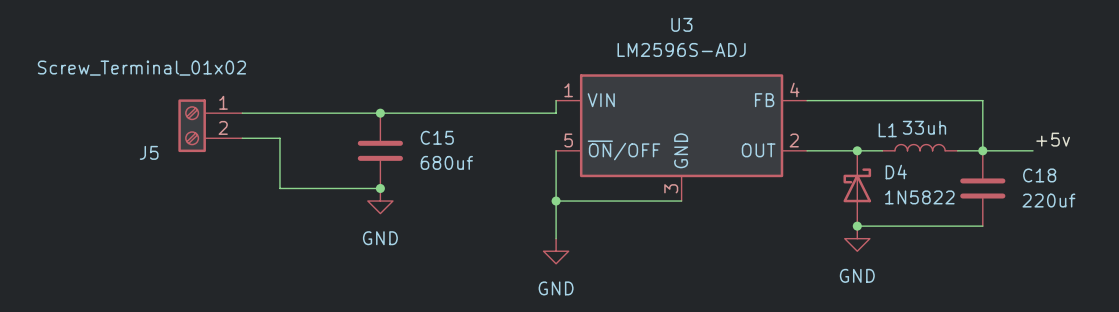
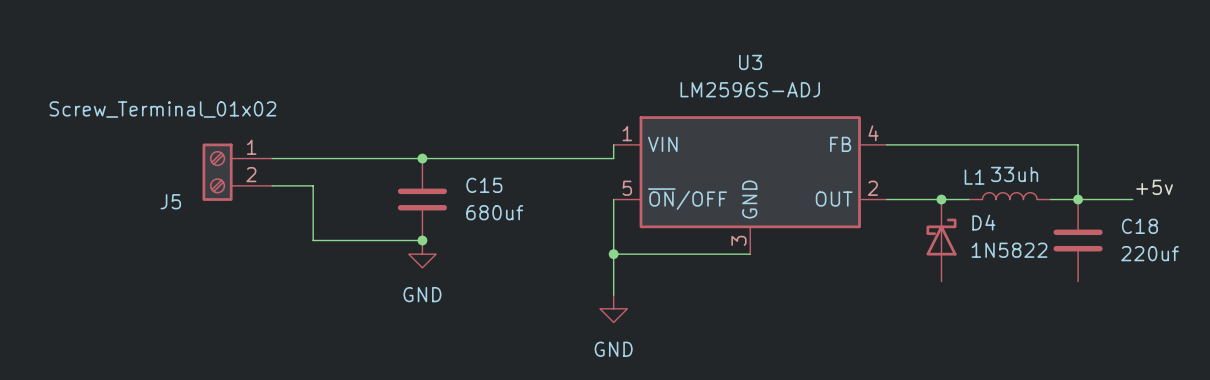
wire: (857, 226) (982, 226) -> none
junction: (857, 226) -> none
power symbol: GND (857, 238) -> none

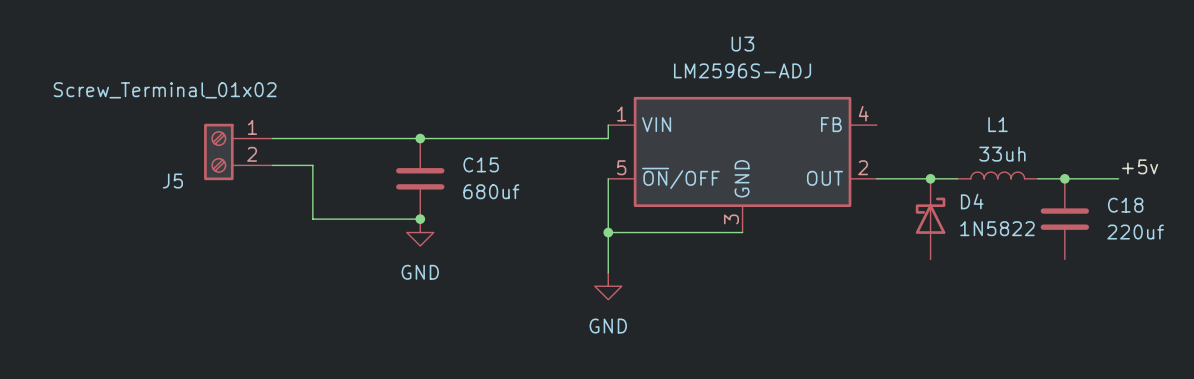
wire: (886, 144) (1078, 144) (1078, 199) -> none
L1 name position: L1 (974, 177) -> L1 (998, 124)

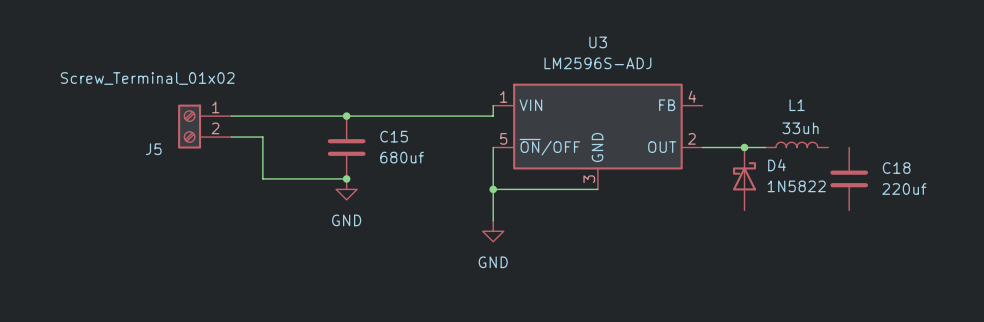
label: +5v (1140, 166) -> none
wire: (1037, 178) (1118, 178) -> none
junction: (1064, 178) -> none

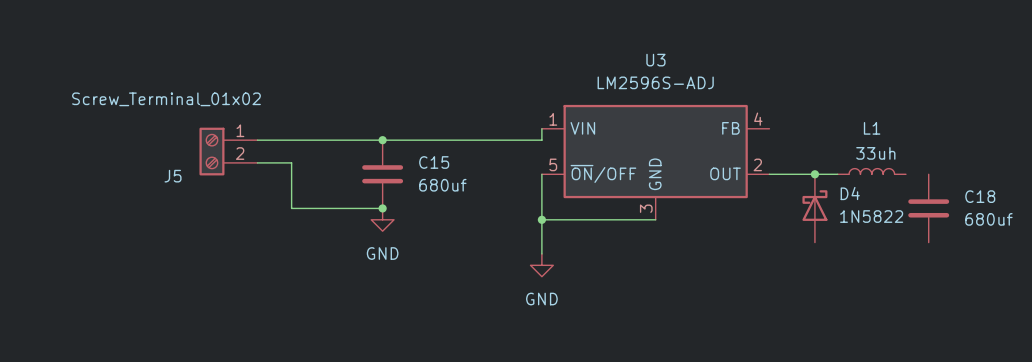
C18 value: 220uf (904, 189) -> 680uf (988, 219)

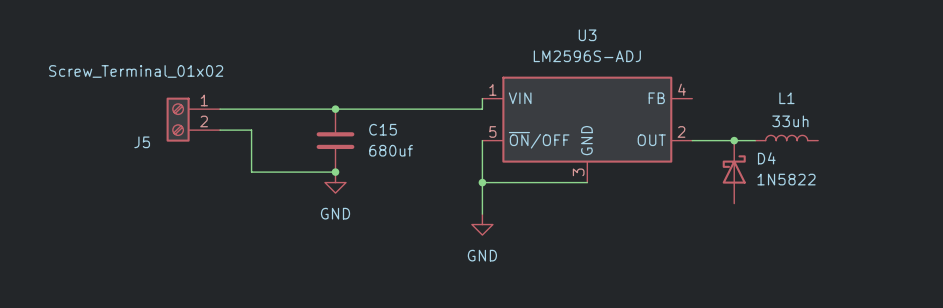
C18: 680uf (928, 208) -> none

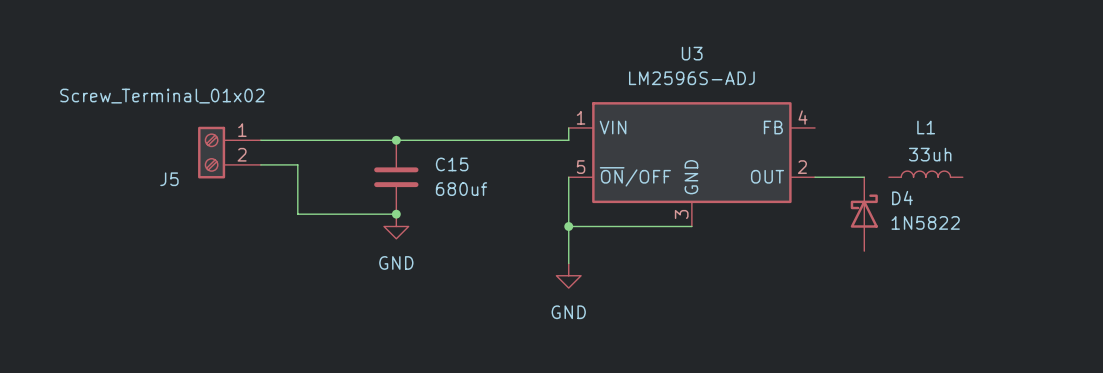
wire: (734, 140) (755, 140) -> none
junction: (734, 140) -> none

